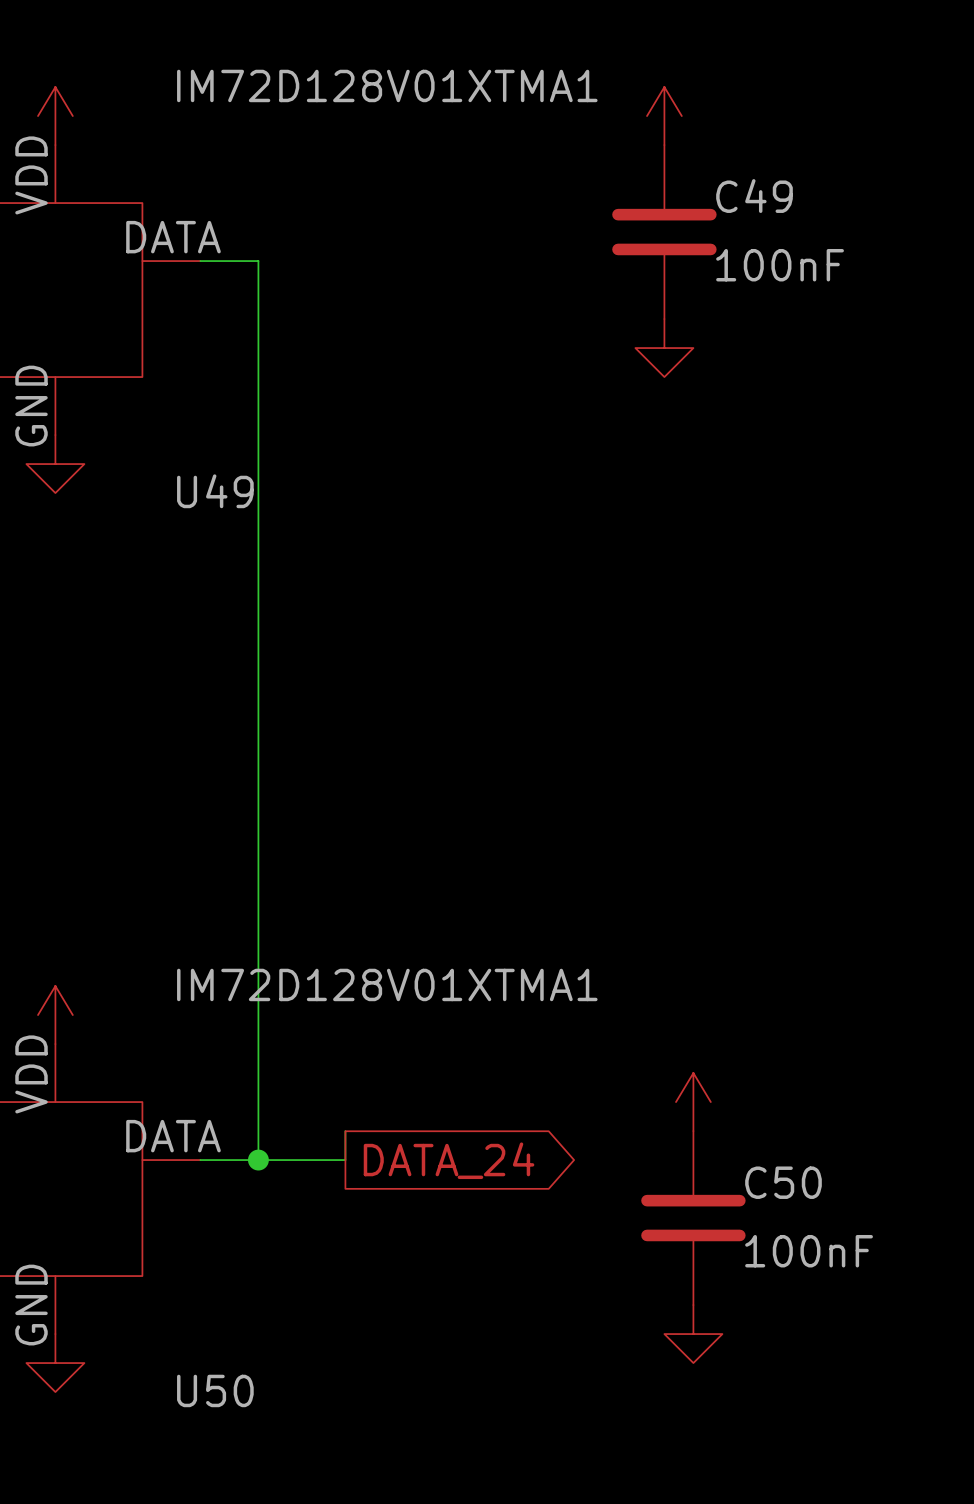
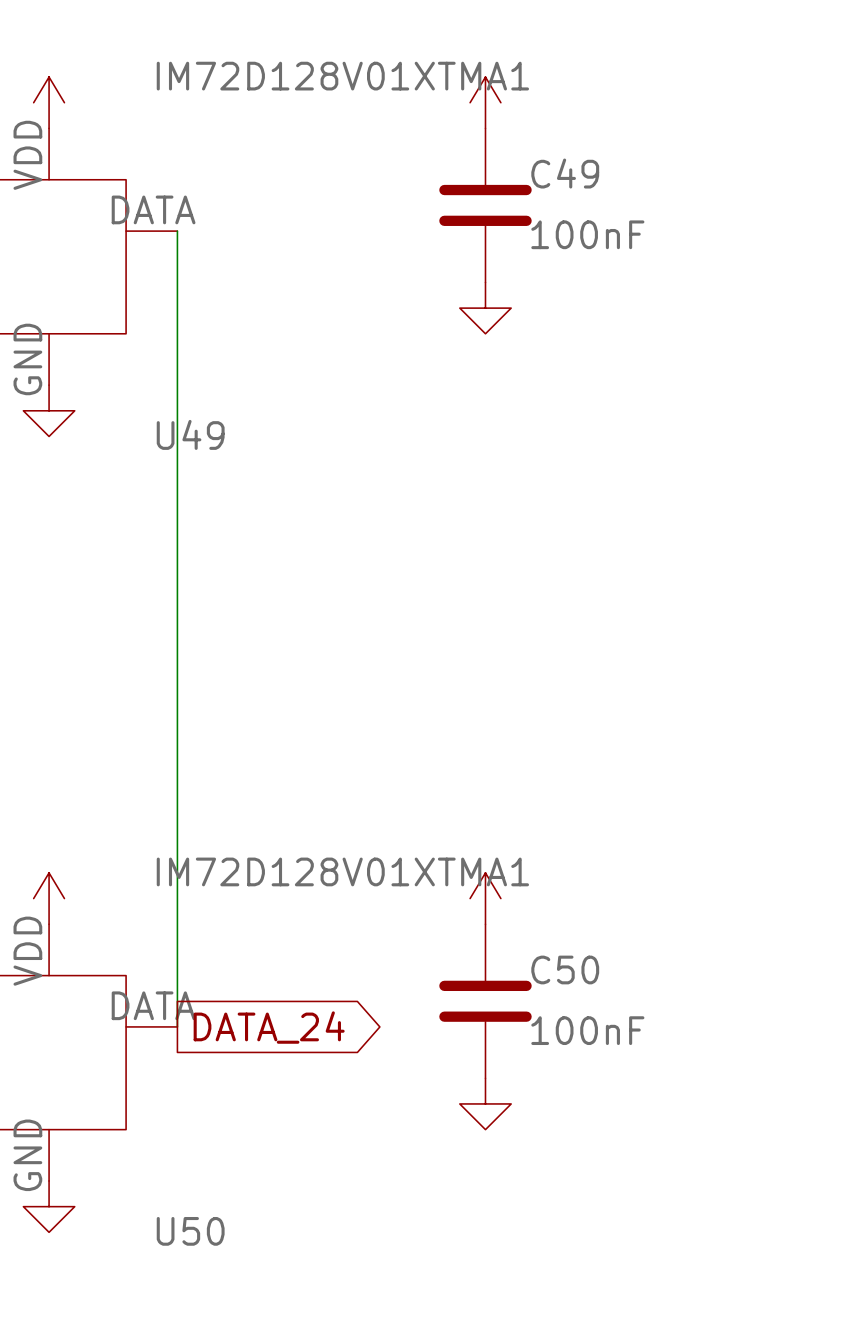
power symbol position: (664, 116) -> (485, 102)
C49 position: (664, 232) -> (485, 205)
wire: (200, 261) (258, 261) (258, 1160) -> (177, 231) (177, 1026)
power symbol position: (664, 348) -> (485, 308)
power symbol position: (693, 1102) -> (485, 898)
wire: (345, 1131) (345, 1160) (200, 1160) -> none
junction: (258, 1160) -> none
global label position: DATA_24 (449, 1160) -> DATA_24 (269, 1027)
C50 position: (693, 1218) -> (485, 1001)
power symbol position: (693, 1334) -> (485, 1103)

